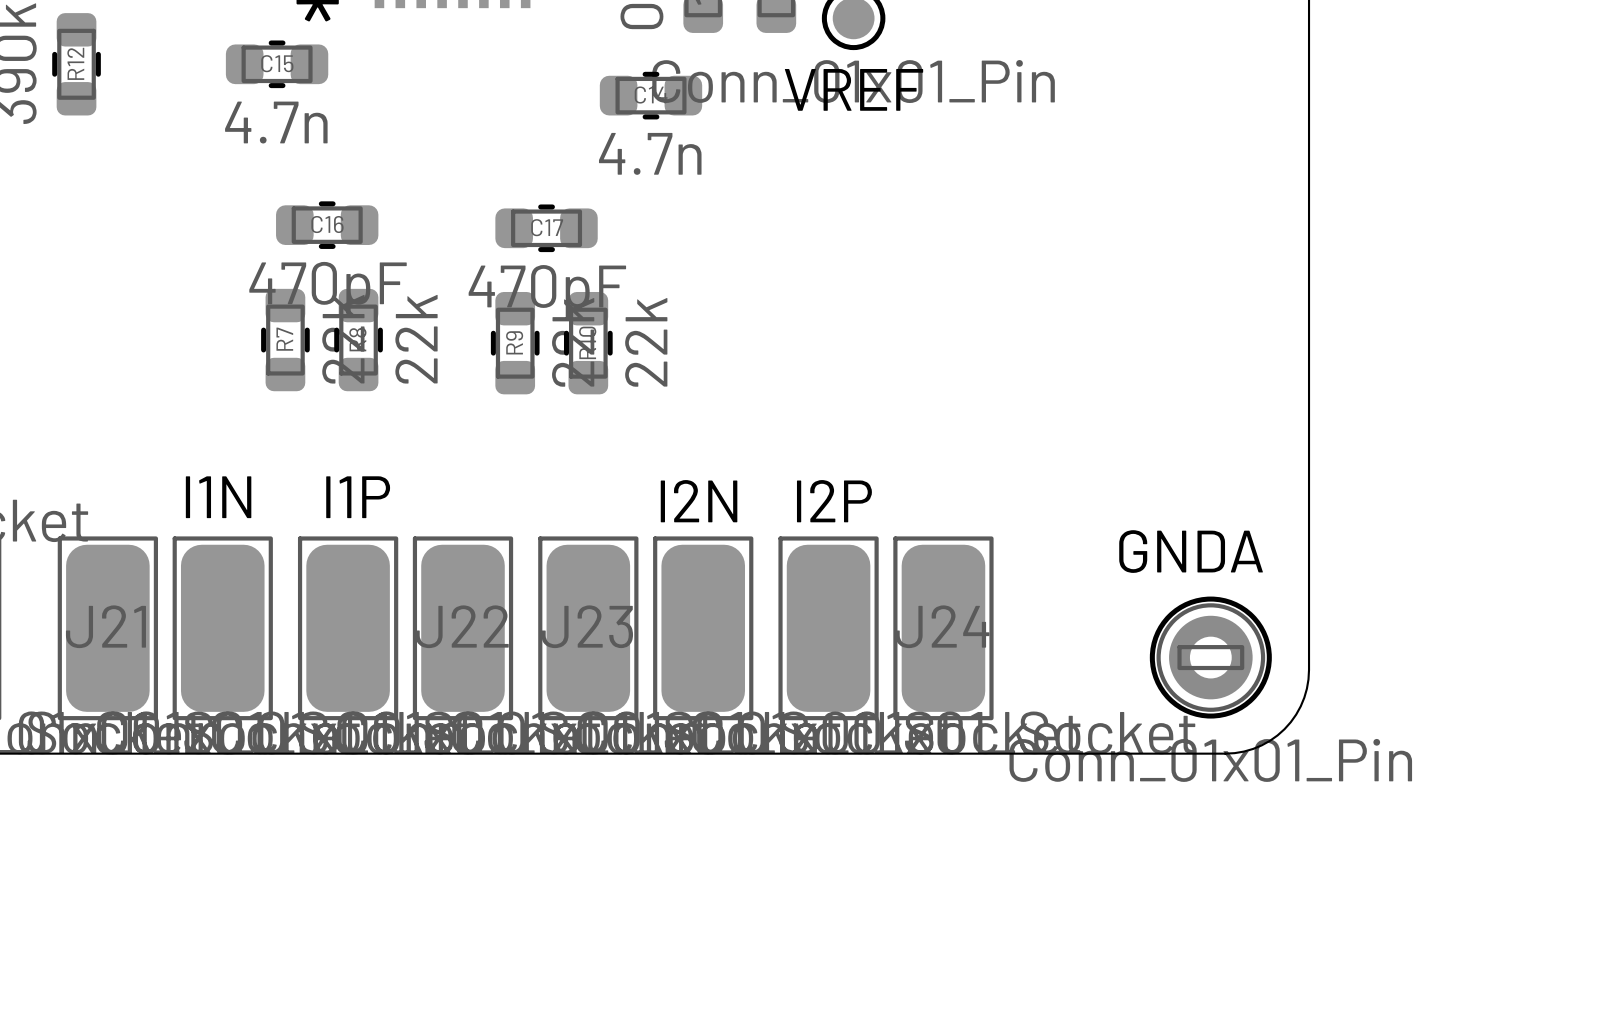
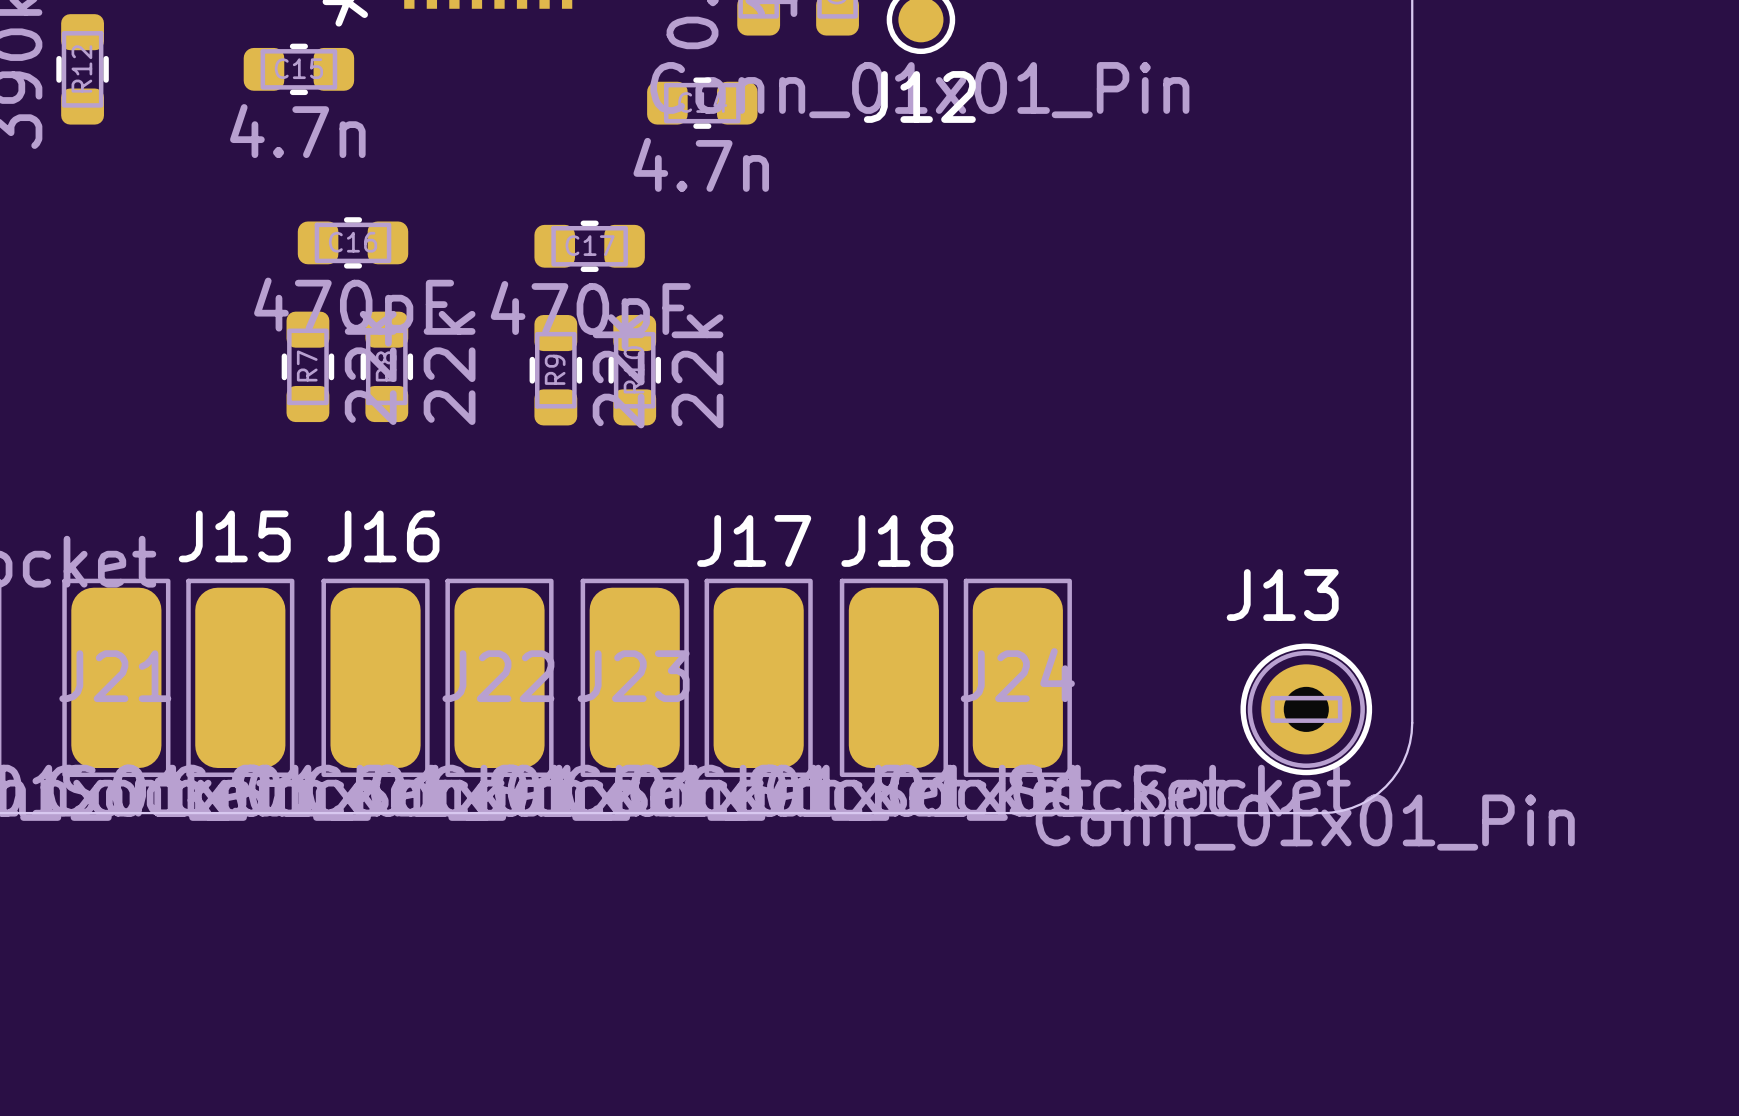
VREF name: VREF (854, 89) -> J12 (919, 96)
I1N name: I1N (218, 497) -> J15 (234, 536)
I1P name: I1P (358, 497) -> J16 (383, 536)
I2N name: I2N (699, 501) -> J17 (754, 540)
I2P name: I2P (834, 501) -> J18 (897, 540)
GNDA name: GNDA (1191, 551) -> J13 (1282, 595)

